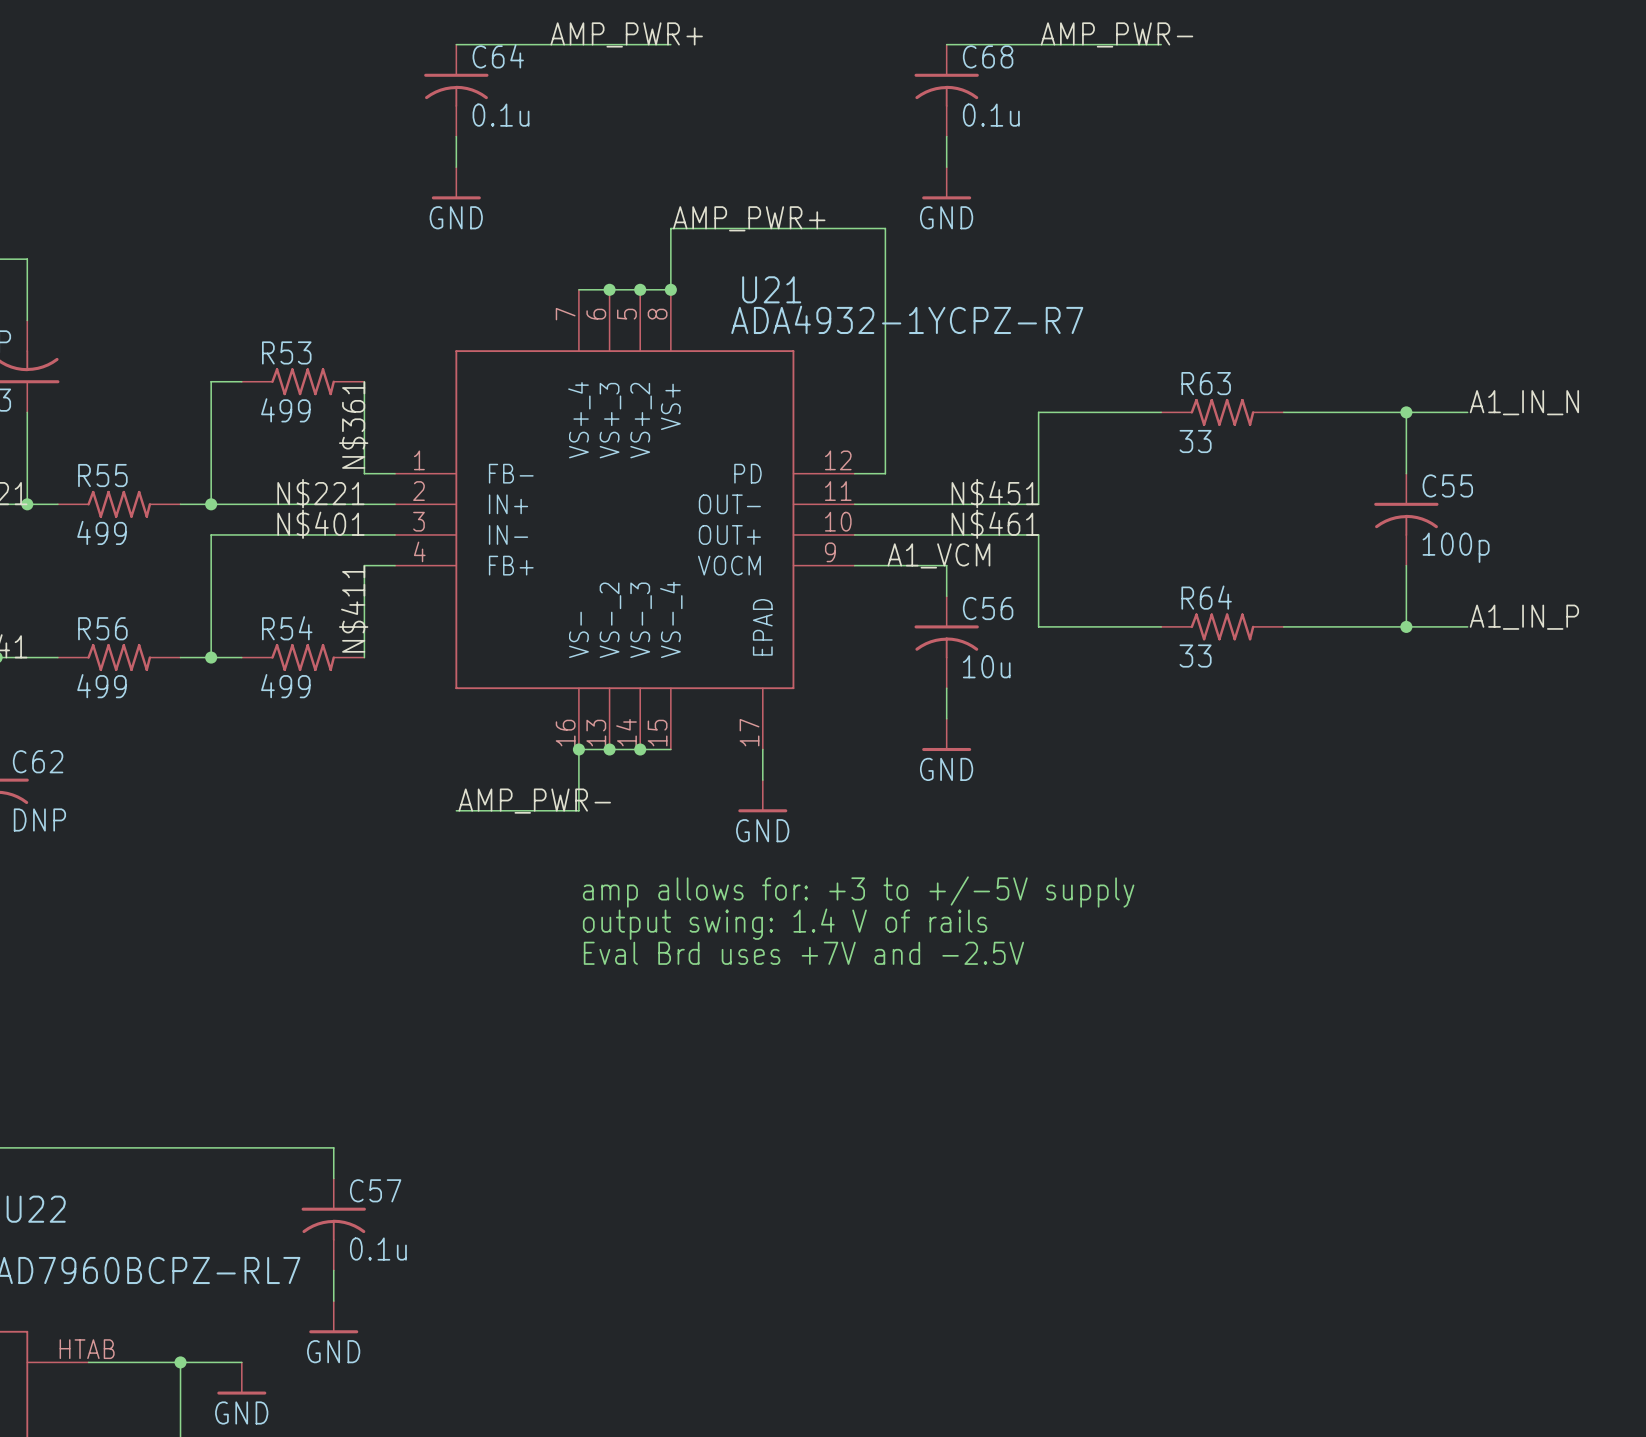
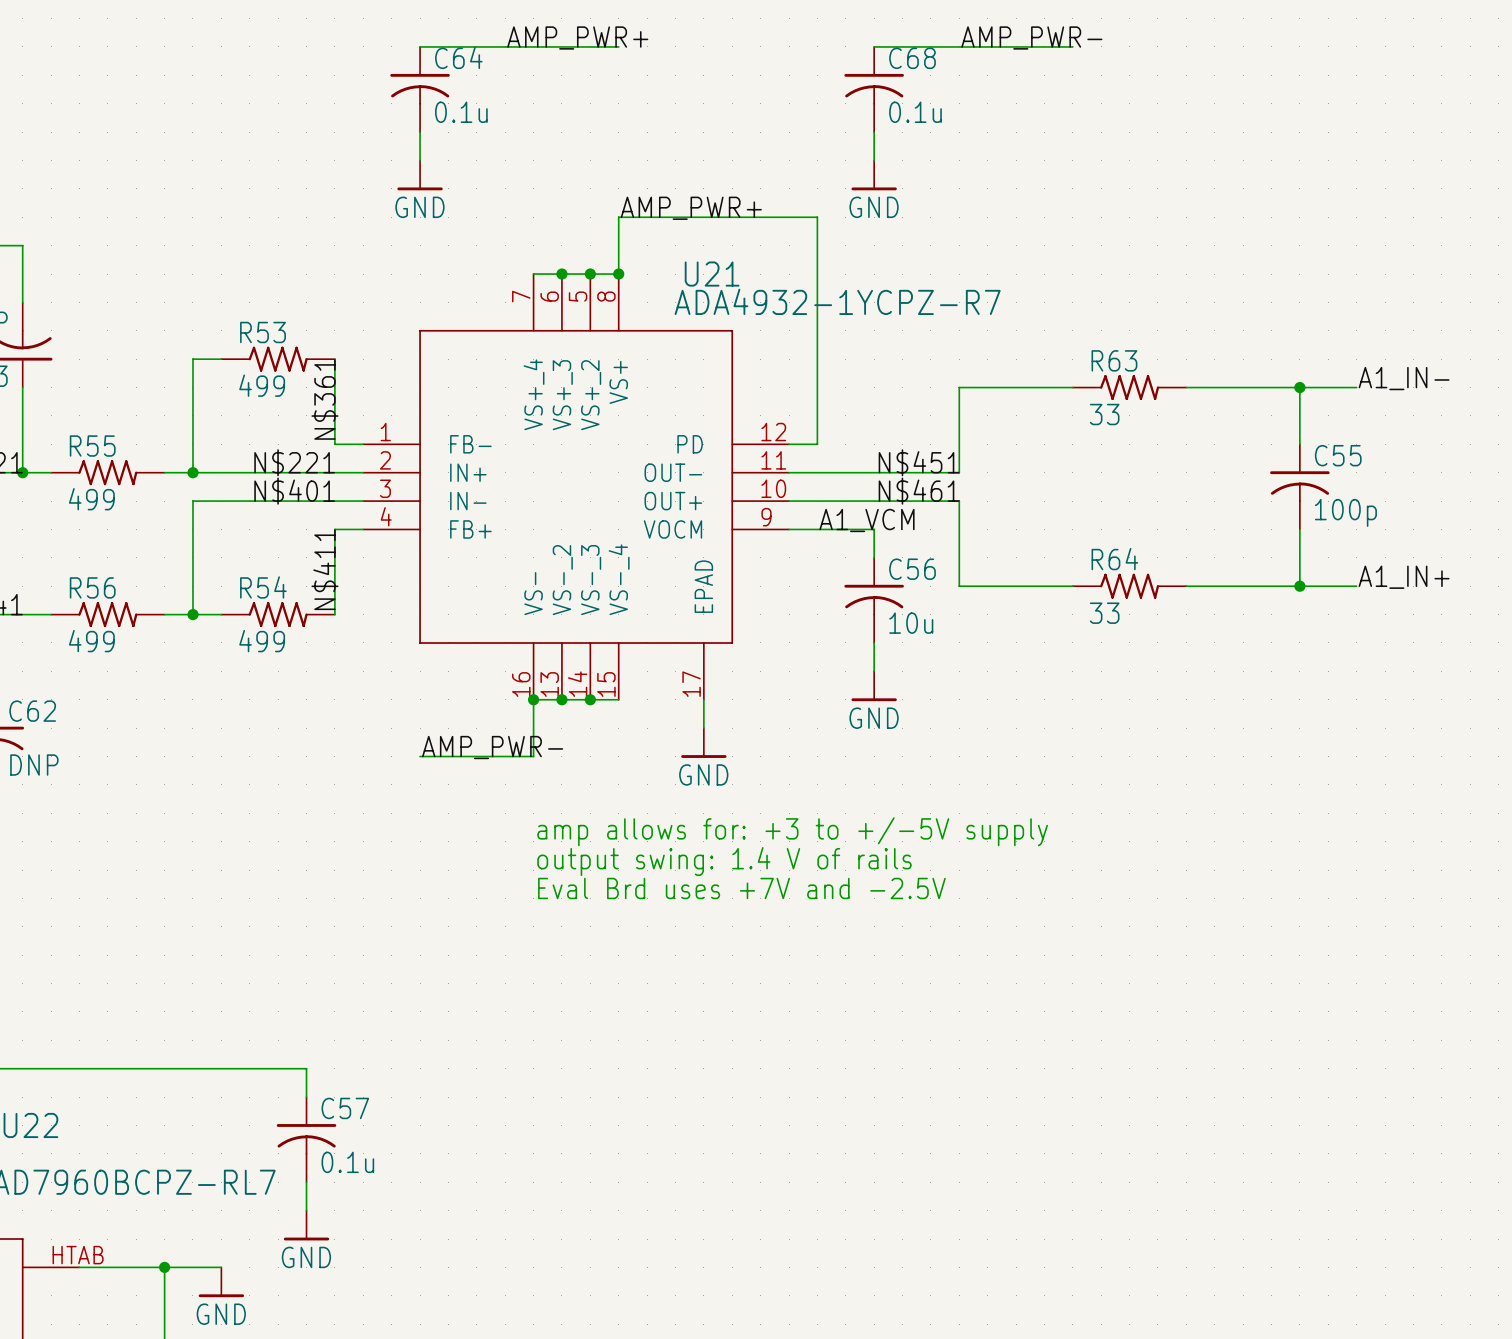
label: A1_IN_N (1524, 402) -> A1_IN- (1404, 378)
label: A1_IN_P (1524, 617) -> A1_IN+ (1404, 577)

